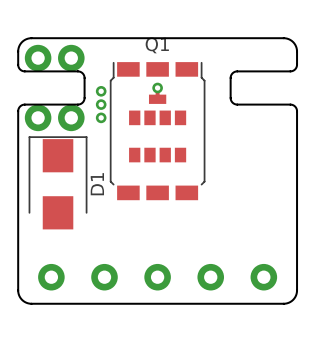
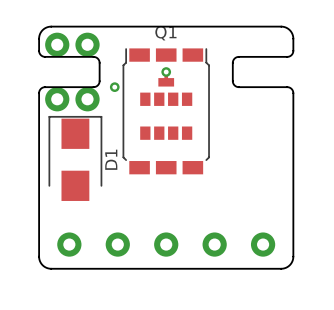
via: (101, 91) -> none
via: (101, 117) -> none

